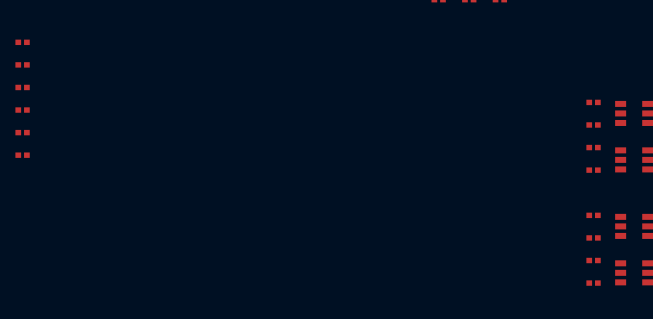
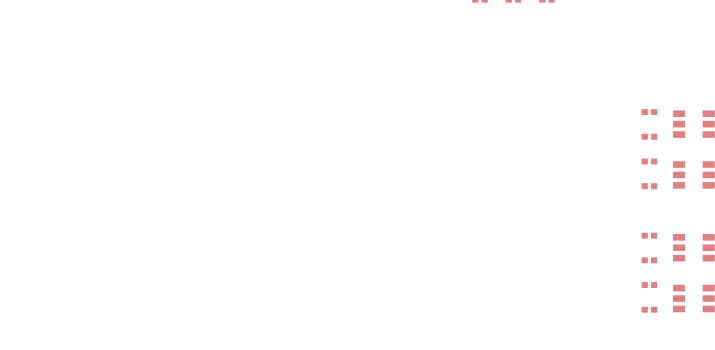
part: (22, 42) -> none
part: (22, 64) -> none
part: (22, 87) -> none
part: (22, 110) -> none
part: (22, 132) -> none
part: (22, 155) -> none

